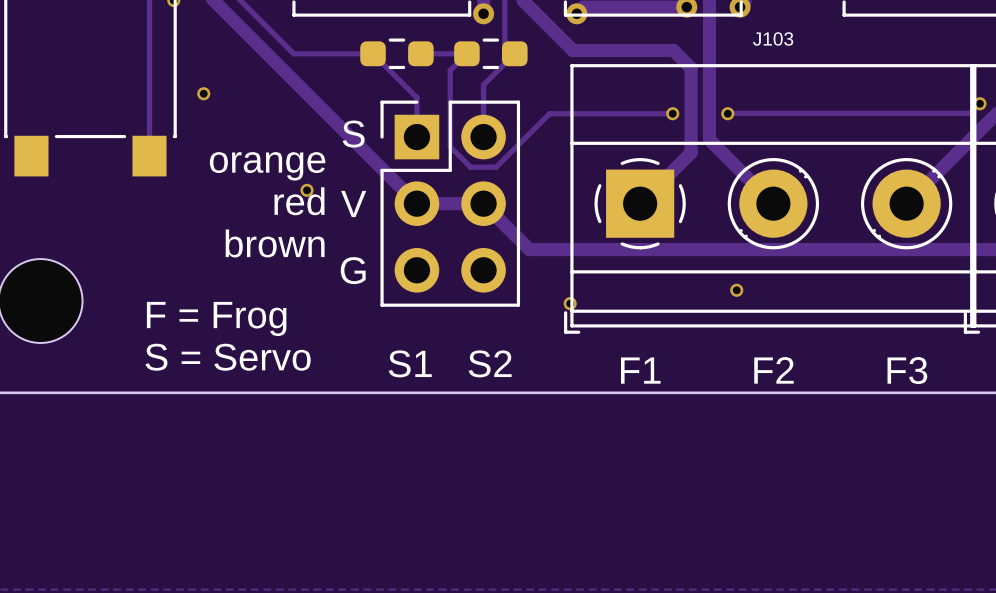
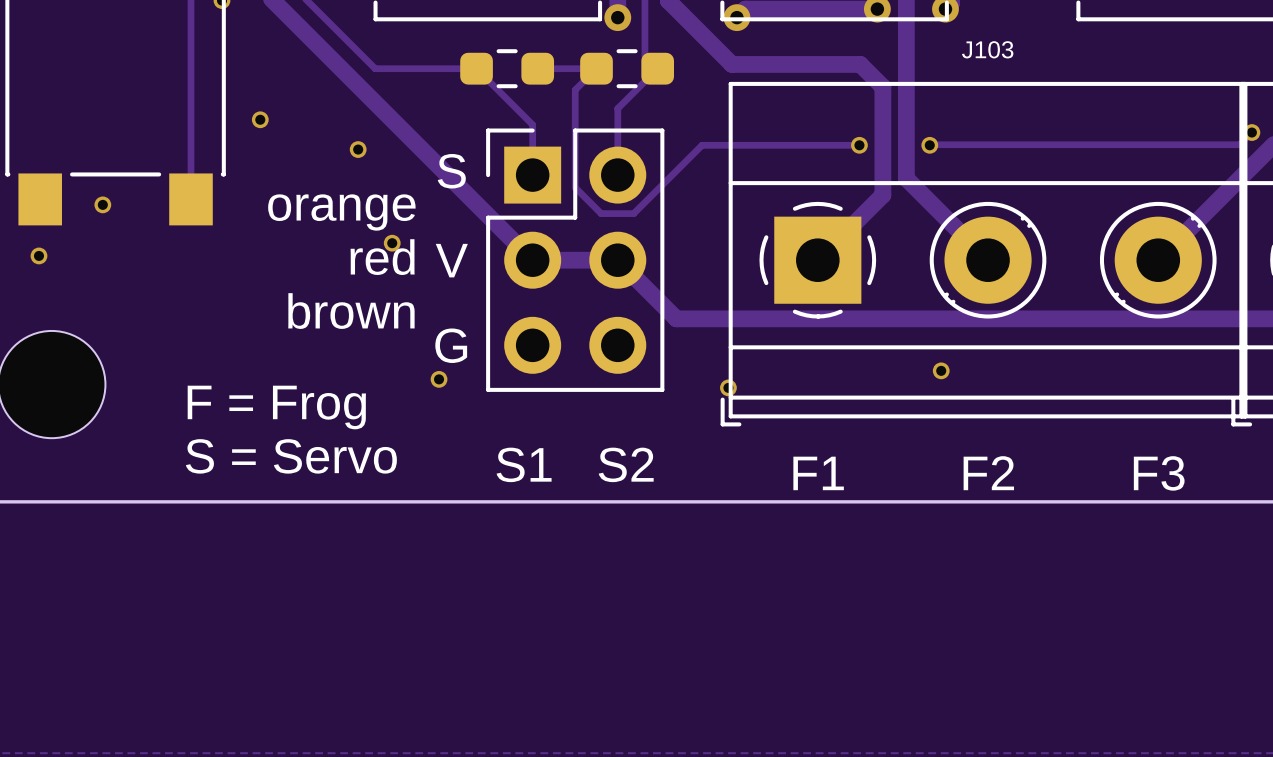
via: none -> (358, 149)
via: none -> (102, 204)
via: none -> (38, 255)
via: none -> (439, 379)

